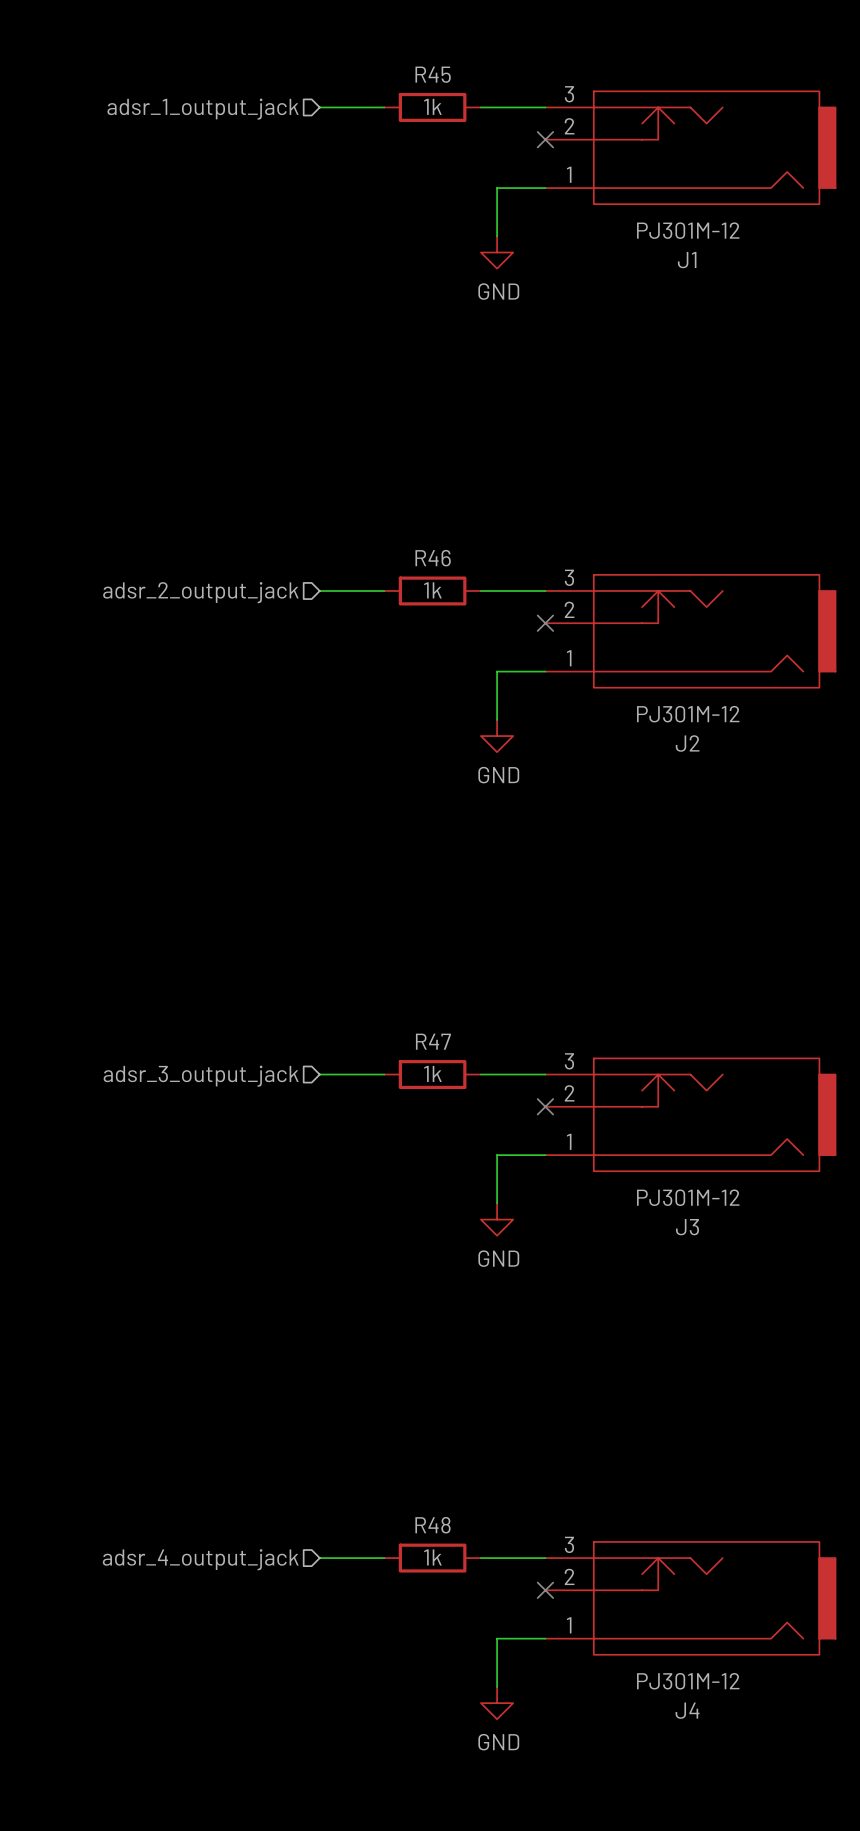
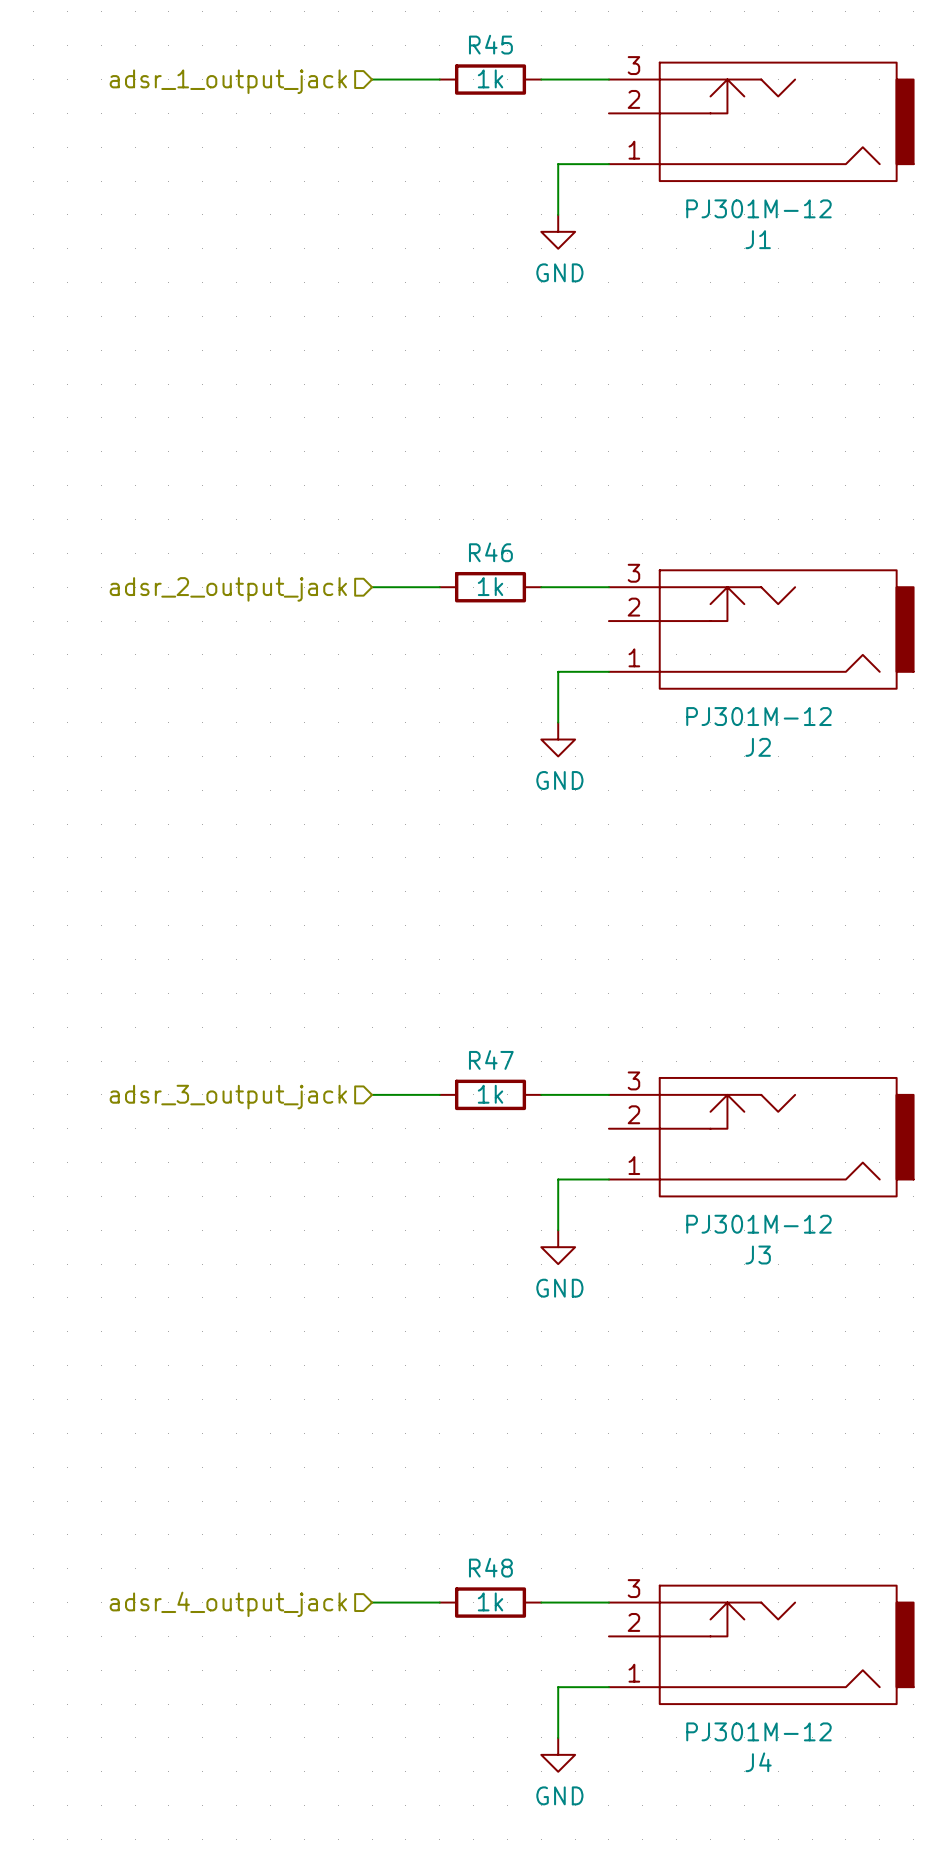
no-connect mark: (545, 139) -> none
no-connect mark: (545, 623) -> none
no-connect mark: (545, 1106) -> none
no-connect mark: (545, 1590) -> none

